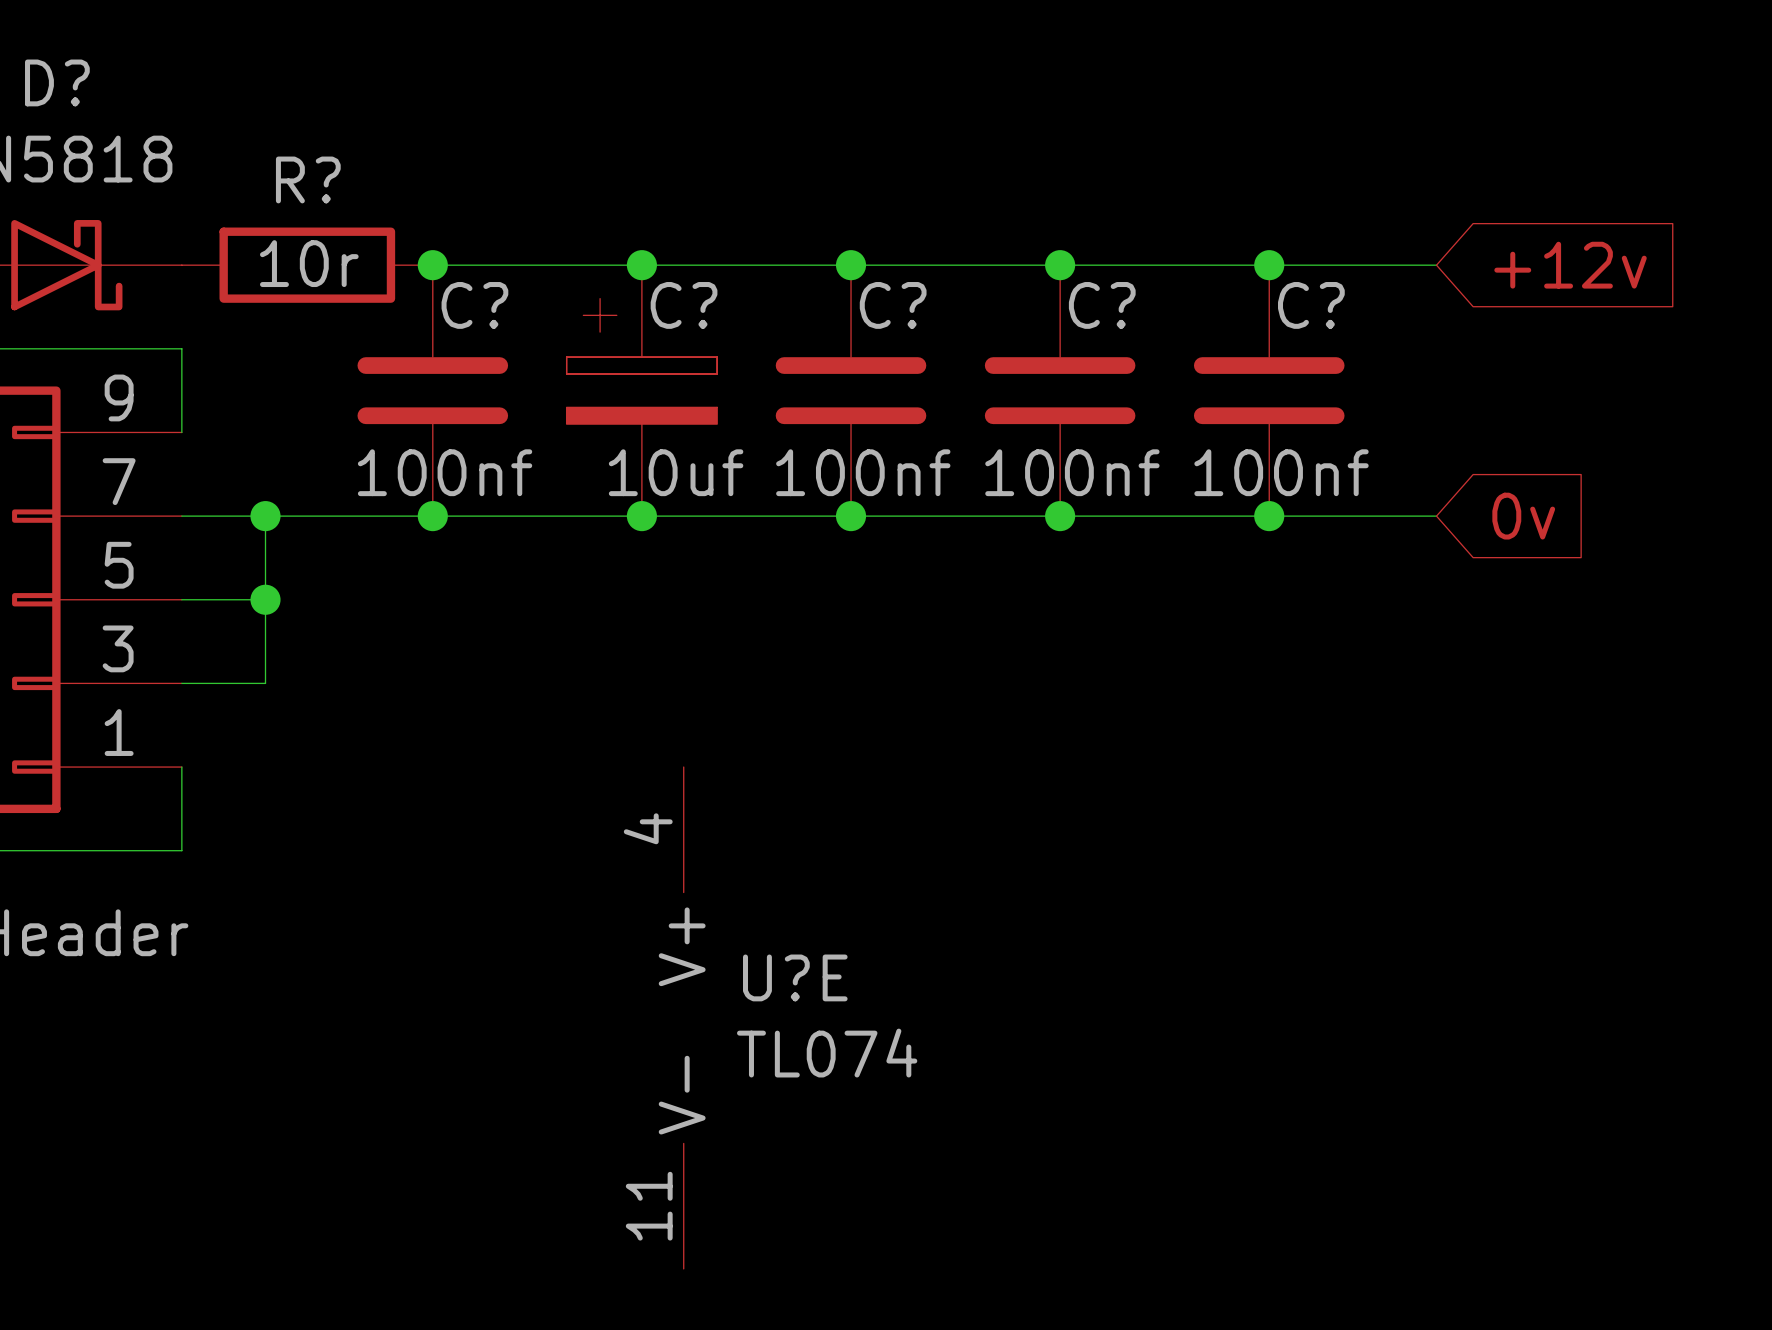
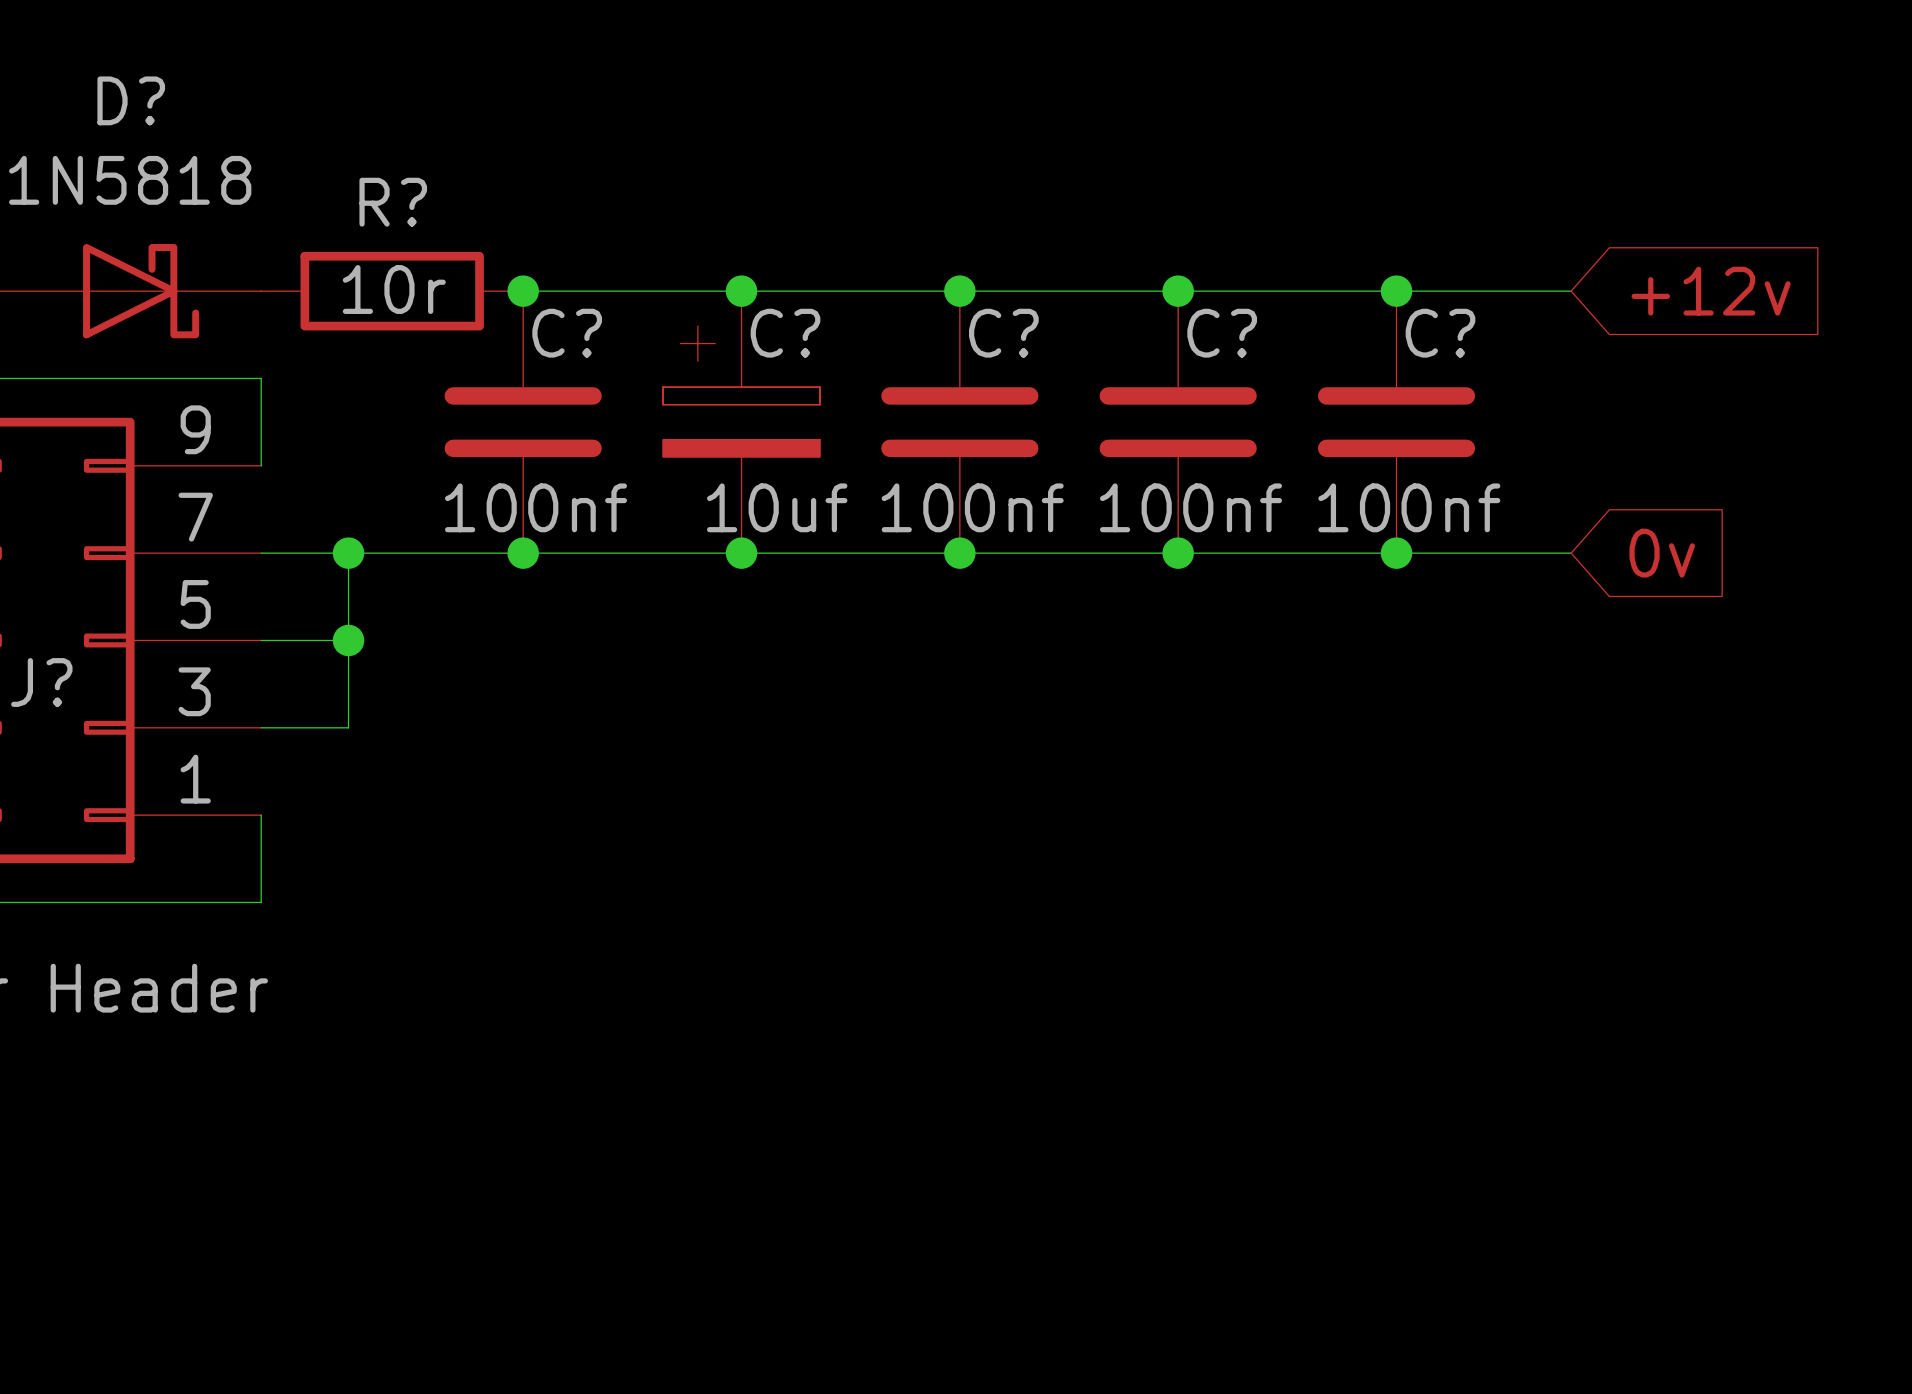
U?E: TL074 (683, 1017) -> none

